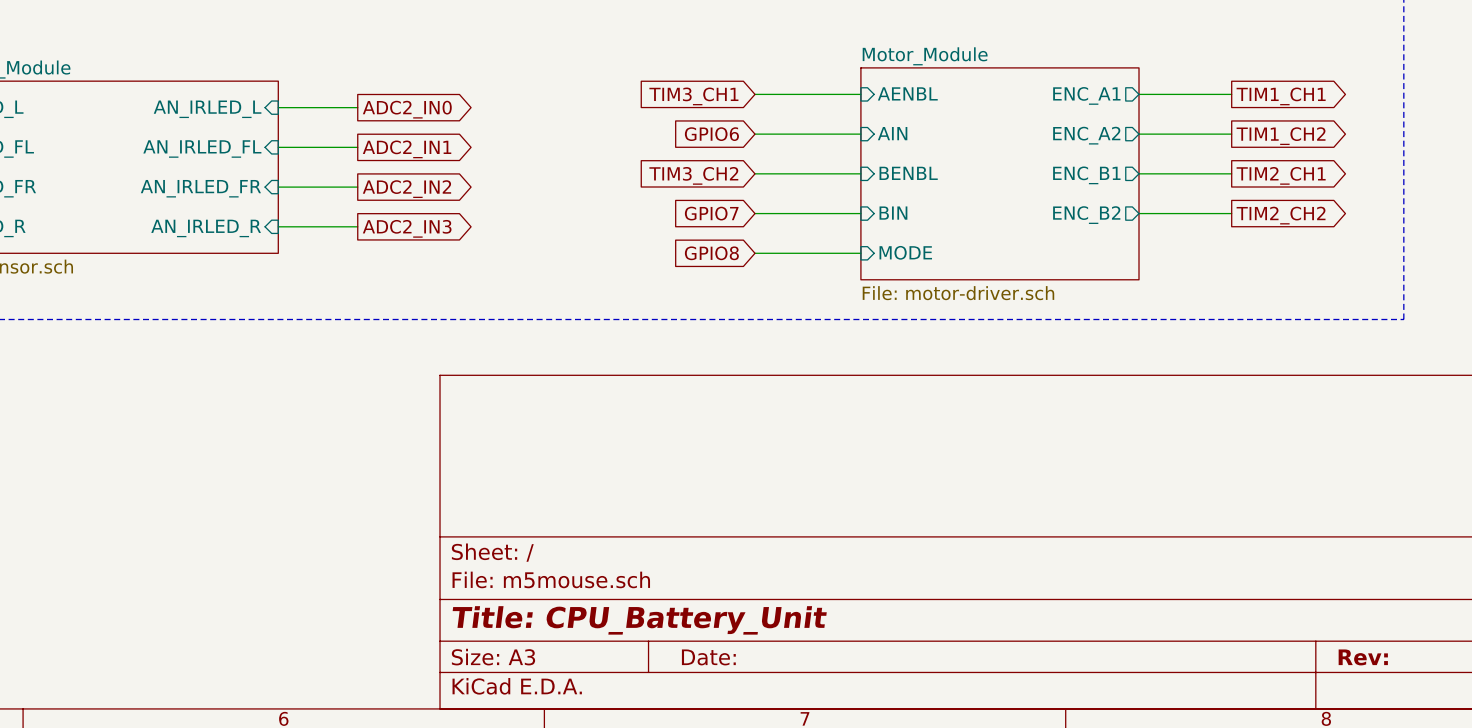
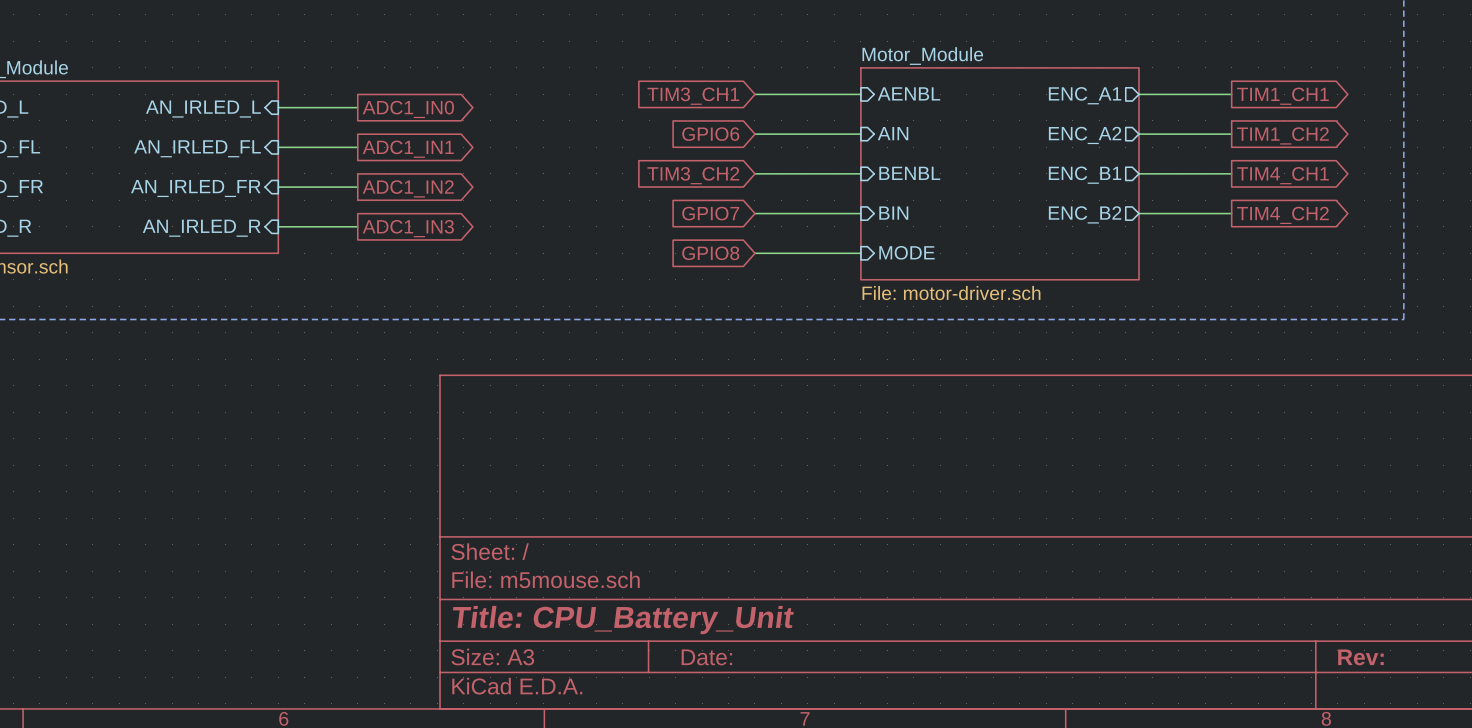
global label: ADC2_IN0 (407, 109) -> ADC1_IN0 (408, 109)
global label: ADC2_IN1 (407, 149) -> ADC1_IN1 (408, 149)
global label: TIM2_CH1 (1281, 175) -> TIM4_CH1 (1282, 175)
global label: ADC2_IN2 (406, 189) -> ADC1_IN2 (408, 188)
global label: TIM2_CH2 (1281, 215) -> TIM4_CH2 (1282, 215)
global label: ADC2_IN3 (407, 228) -> ADC1_IN3 (408, 228)

